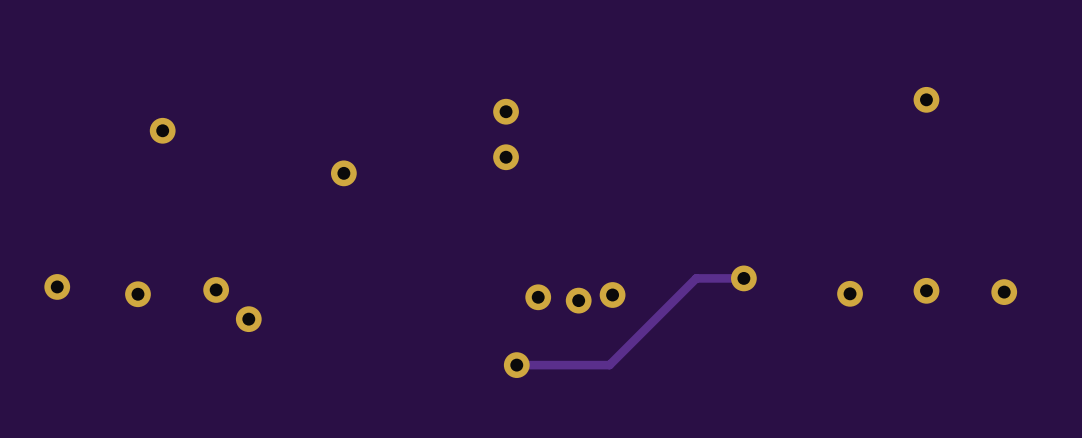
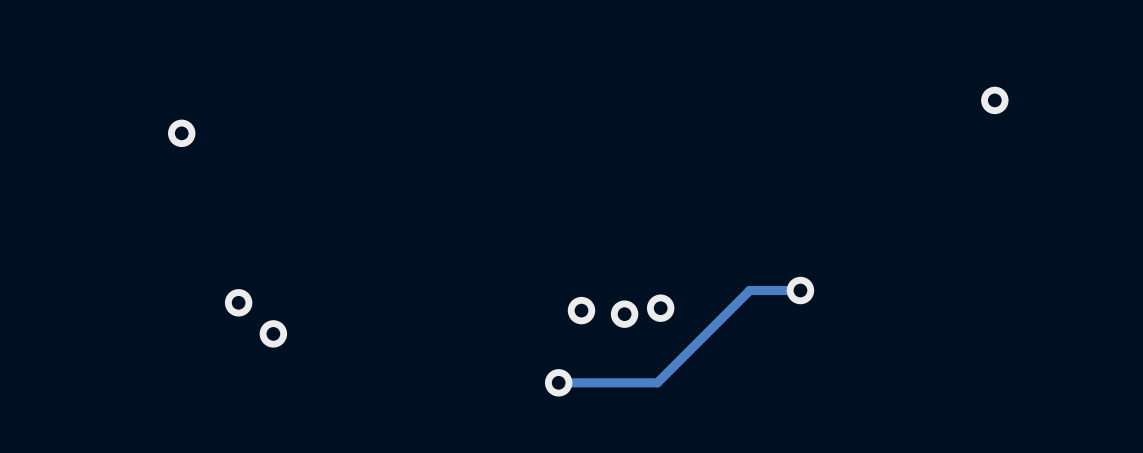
via: (506, 111) -> none
via: (506, 157) -> none
via: (343, 173) -> none
via: (57, 286) -> none
via: (926, 290) -> none
via: (1004, 292) -> none
via: (850, 293) -> none
via: (137, 294) -> none

